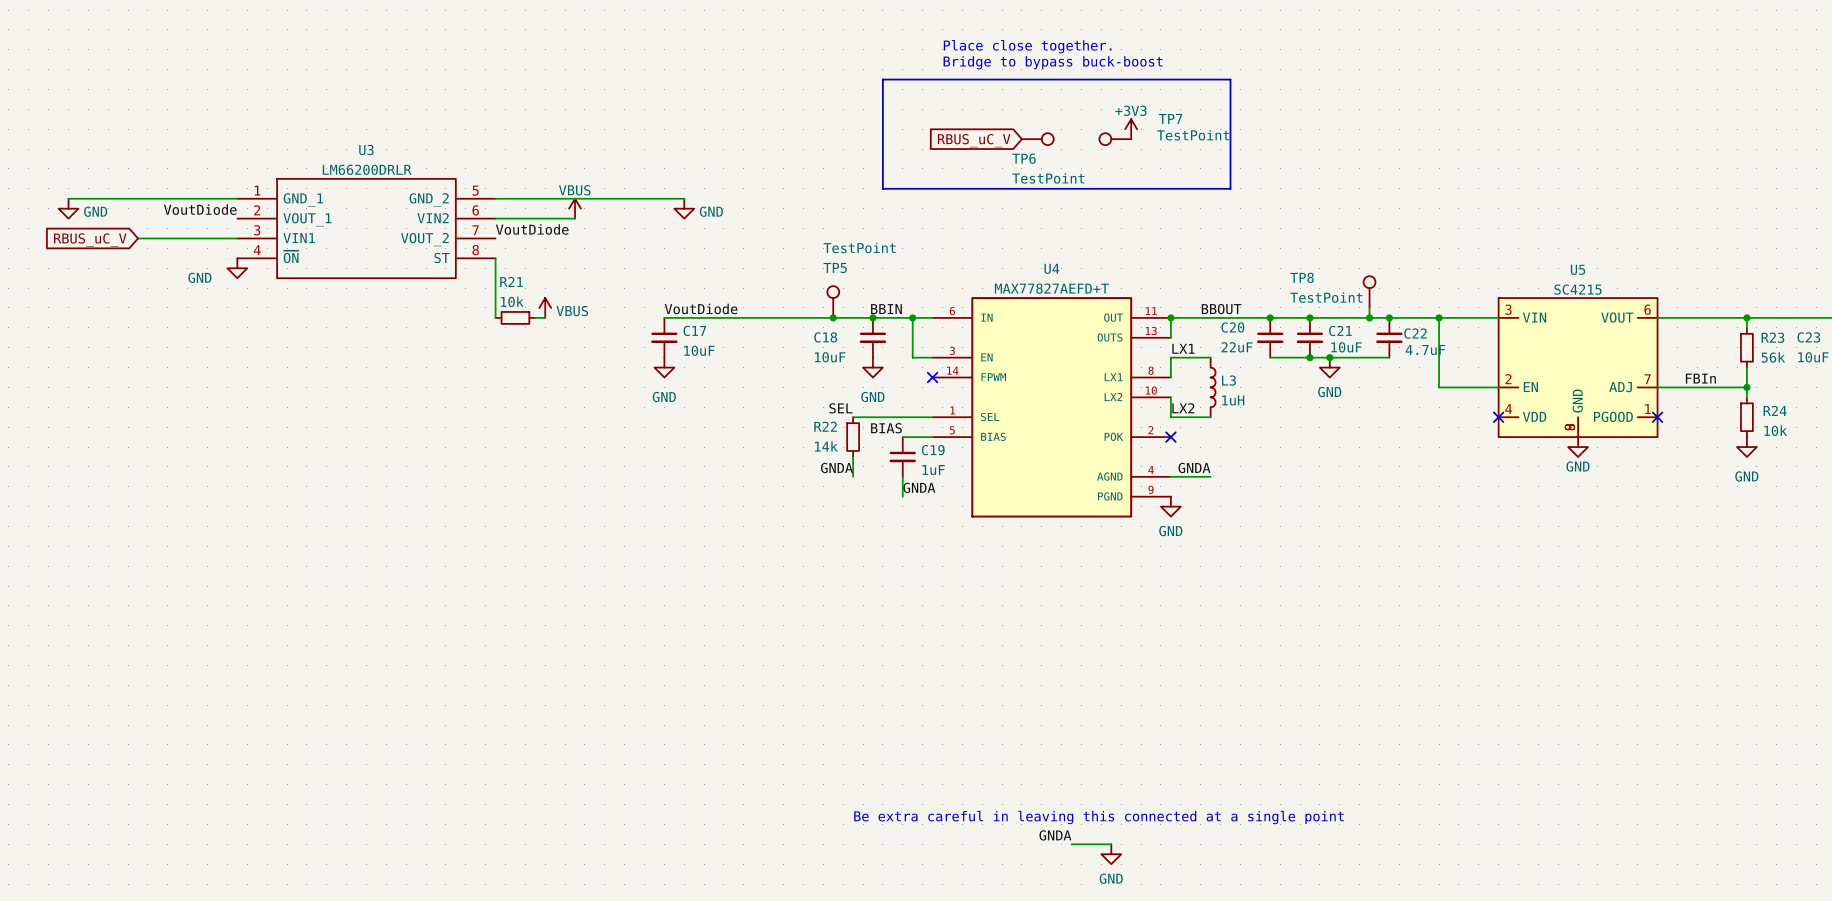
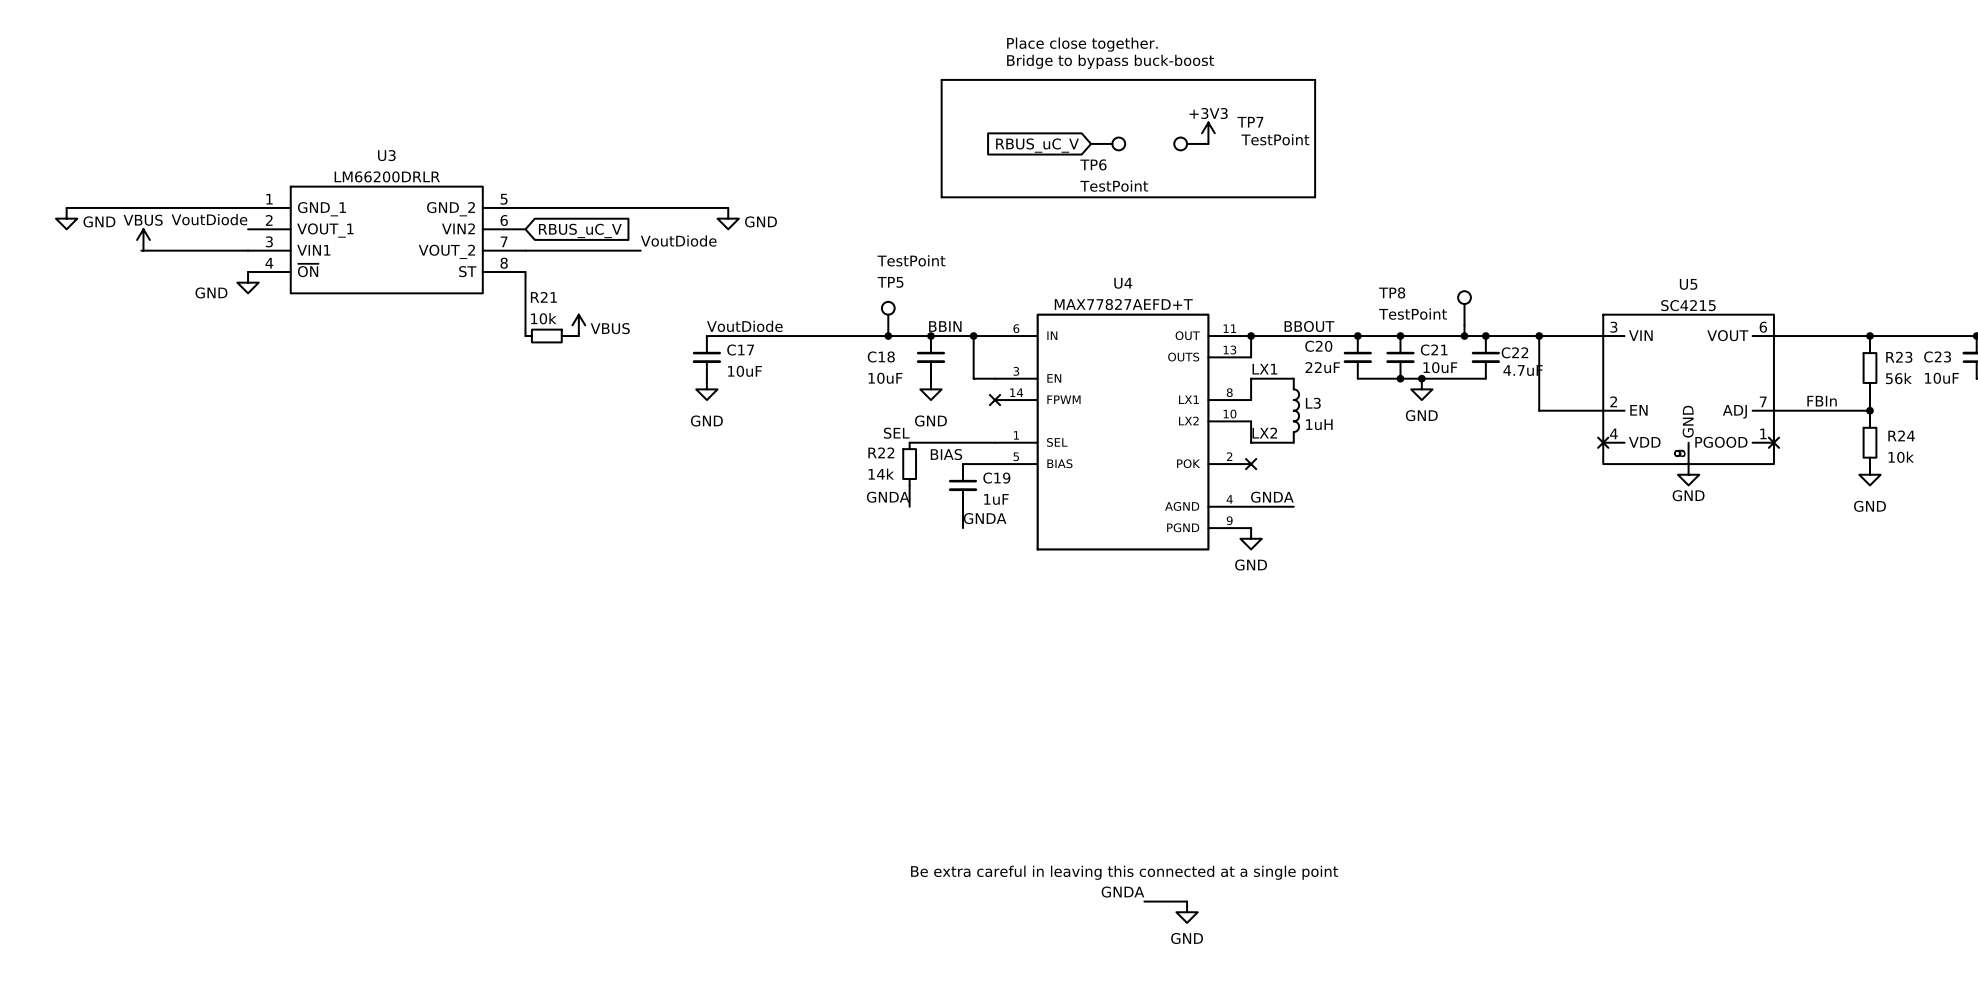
power symbol: VBUS (575, 208) -> none
wire: (495, 218) (575, 218) -> none
global label: none -> RBUS_uC_V (580, 230)
power symbol: none -> VBUS (143, 239)
label position: VoutDiode (532, 229) -> VoutDiode (678, 241)
wire: none -> (525, 250) (640, 250)
global label: RBUS_uC_V (90, 239) -> none

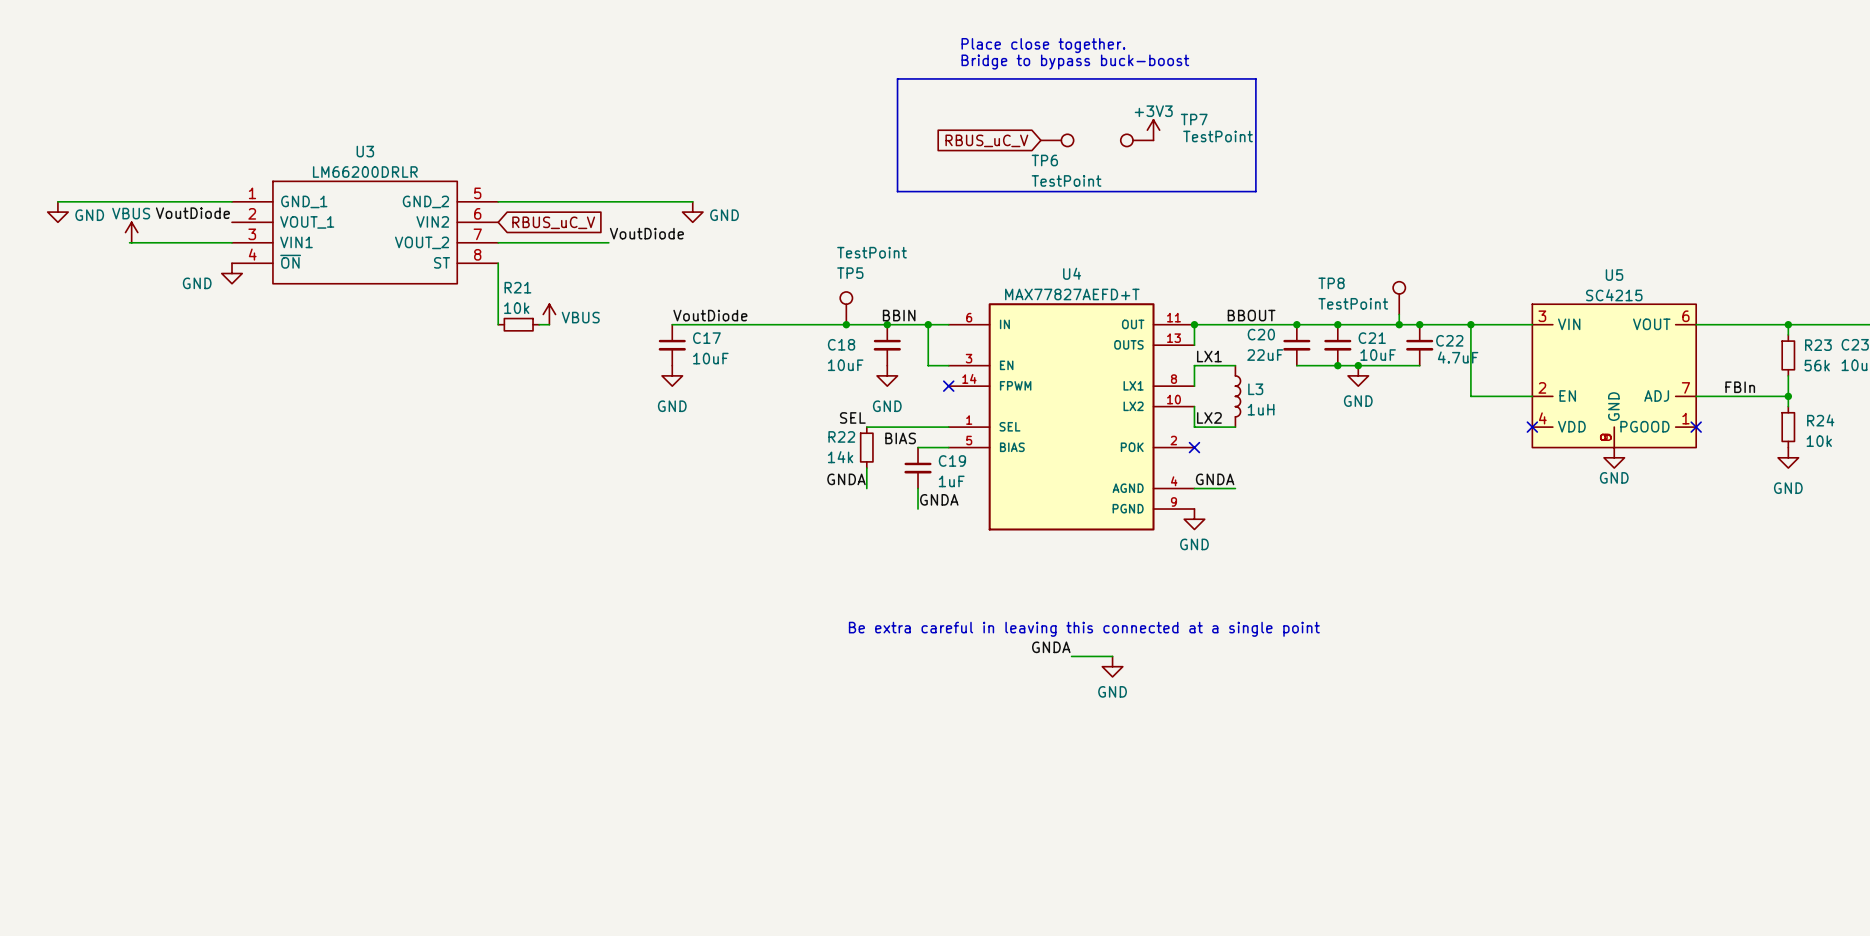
text: none -> Be extra careful in leaving this connected at a single point (1084, 629)
label: none -> GNDA (1051, 647)
wire: none -> (1071, 656) (1112, 656)
power symbol: none -> GND (1112, 666)
text: Be extra careful in leaving this connected at a single point (1124, 872) -> none
label: GNDA (1122, 892) -> none
wire: (1144, 901) (1187, 901) -> none
power symbol: GND (1187, 912) -> none

